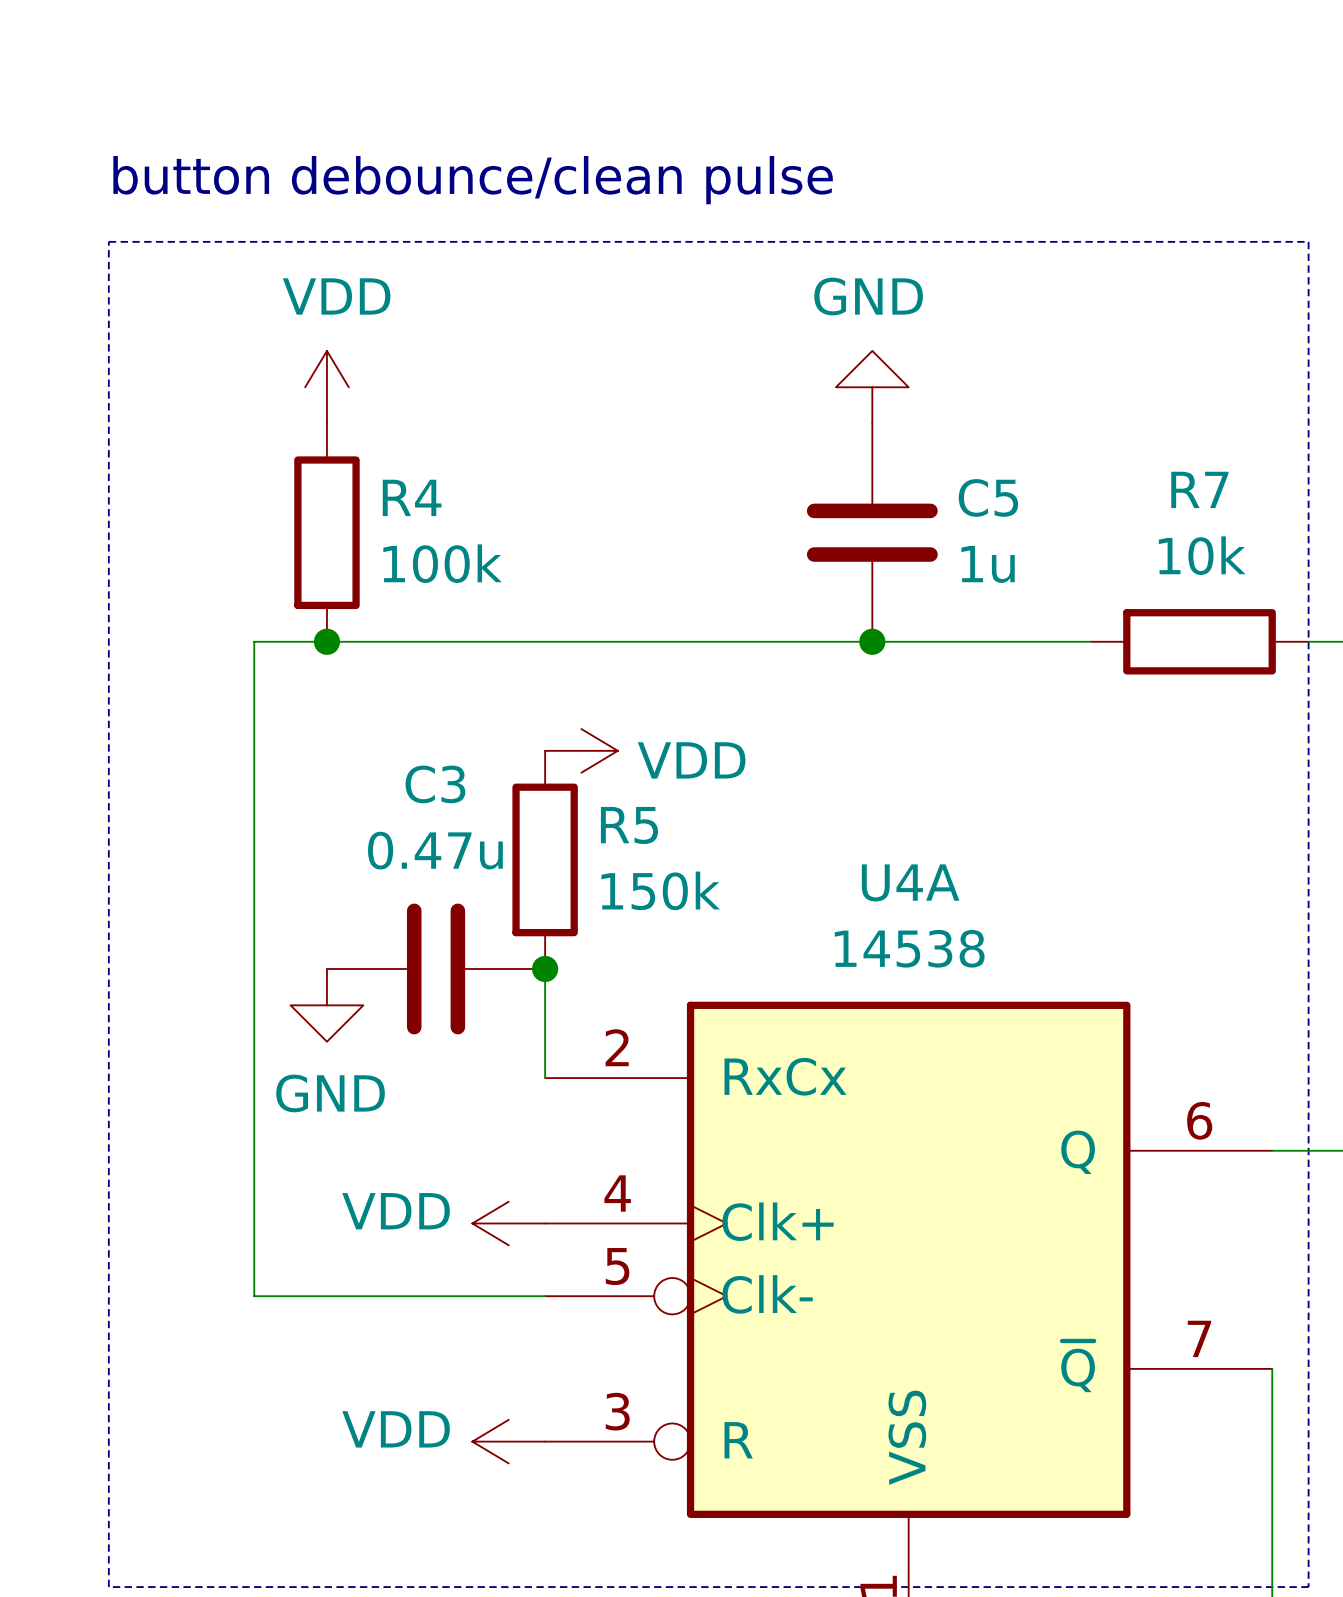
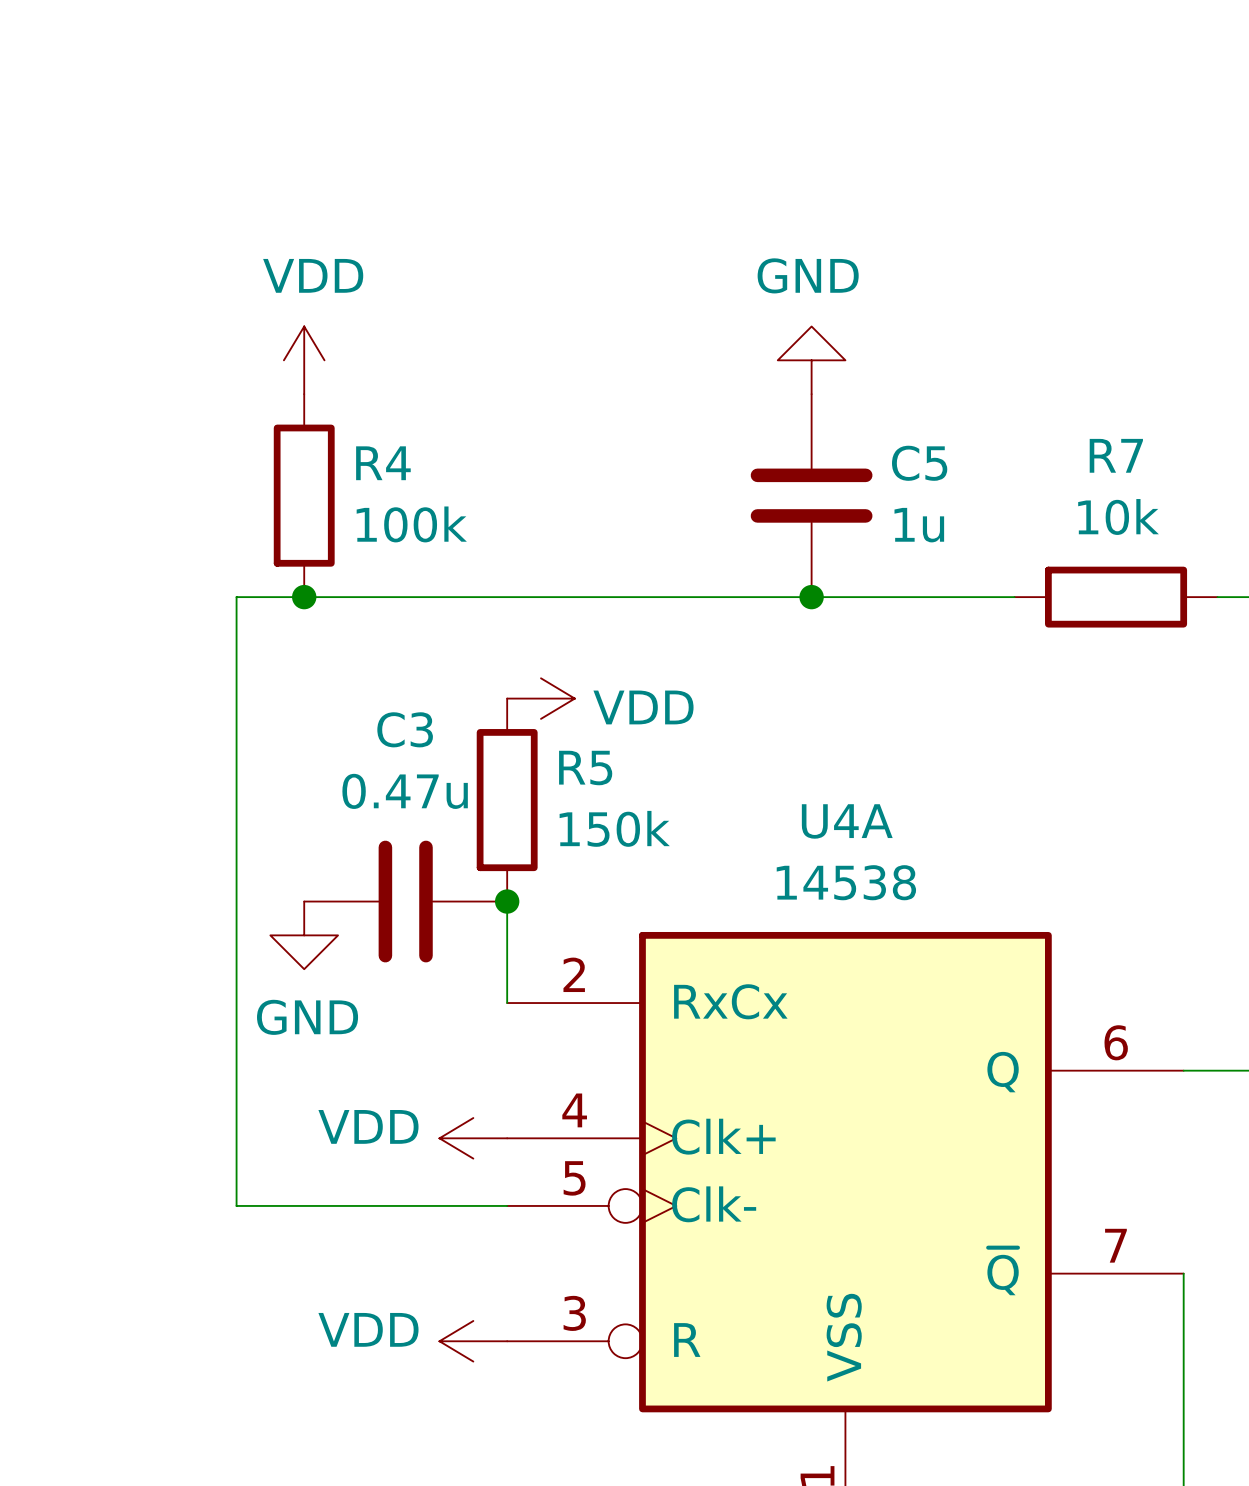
text: button debounce/clean pulse (473, 180) -> none
line: (108, 241) (108, 1587) (1308, 1587) (1308, 241) (108, 241) -> none

